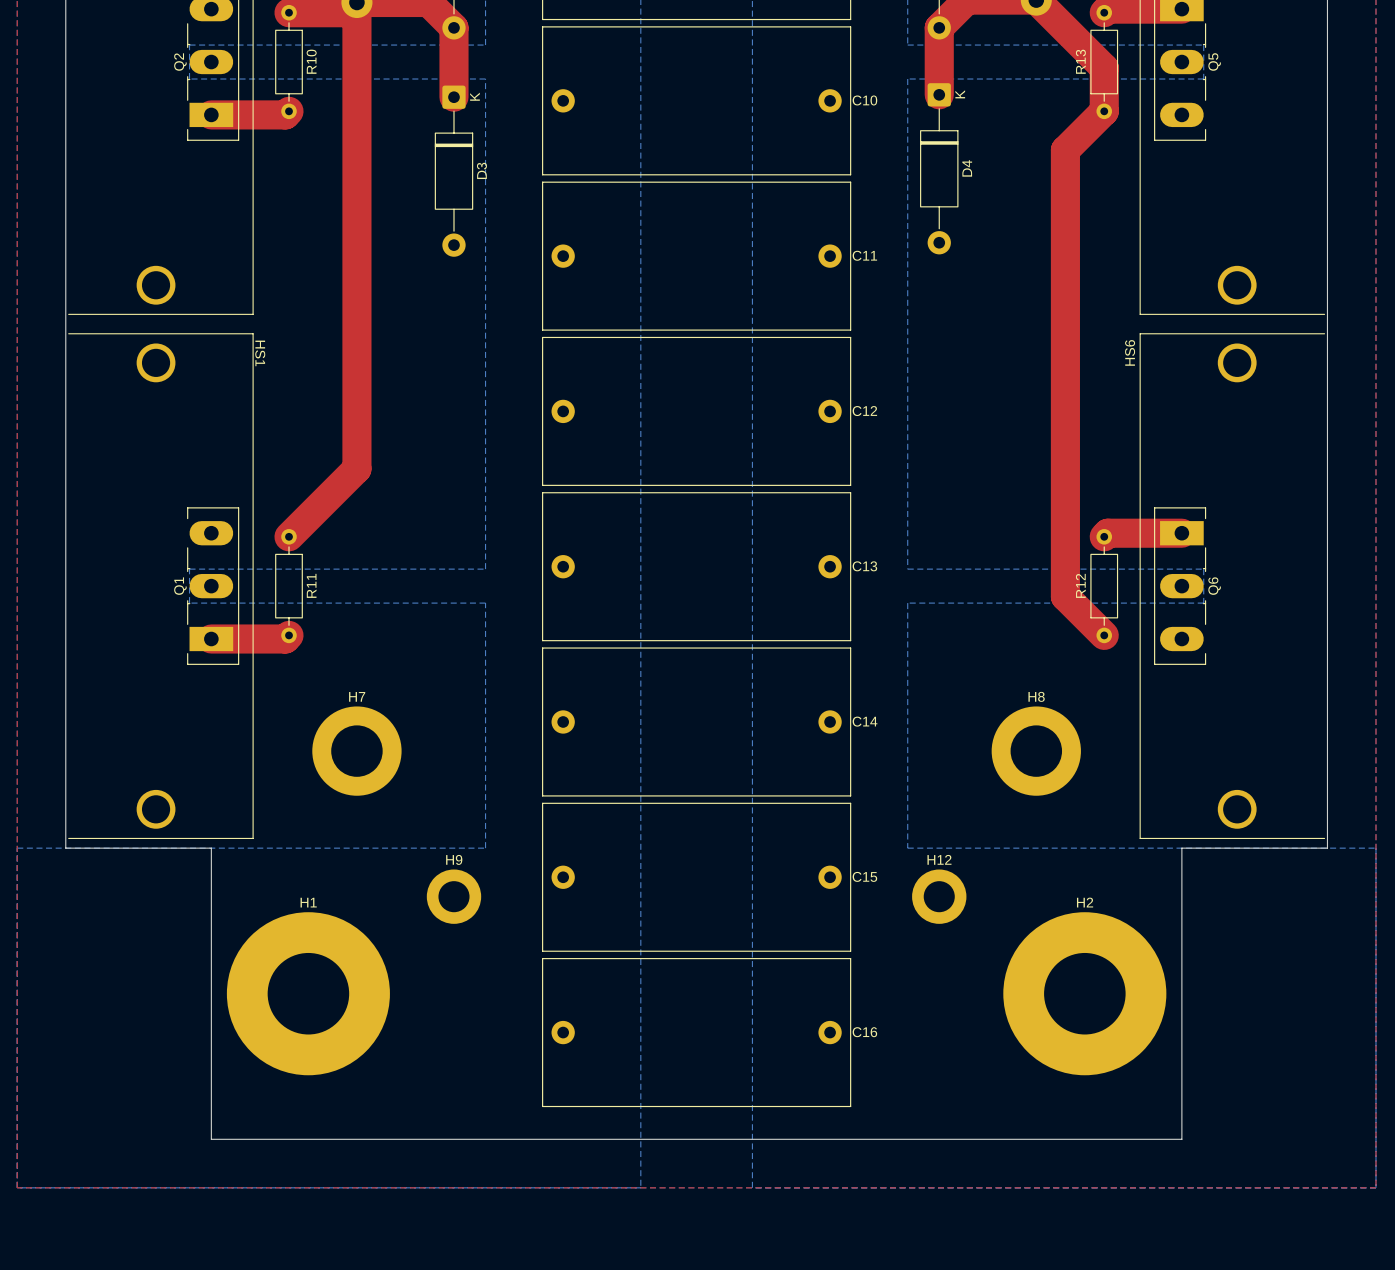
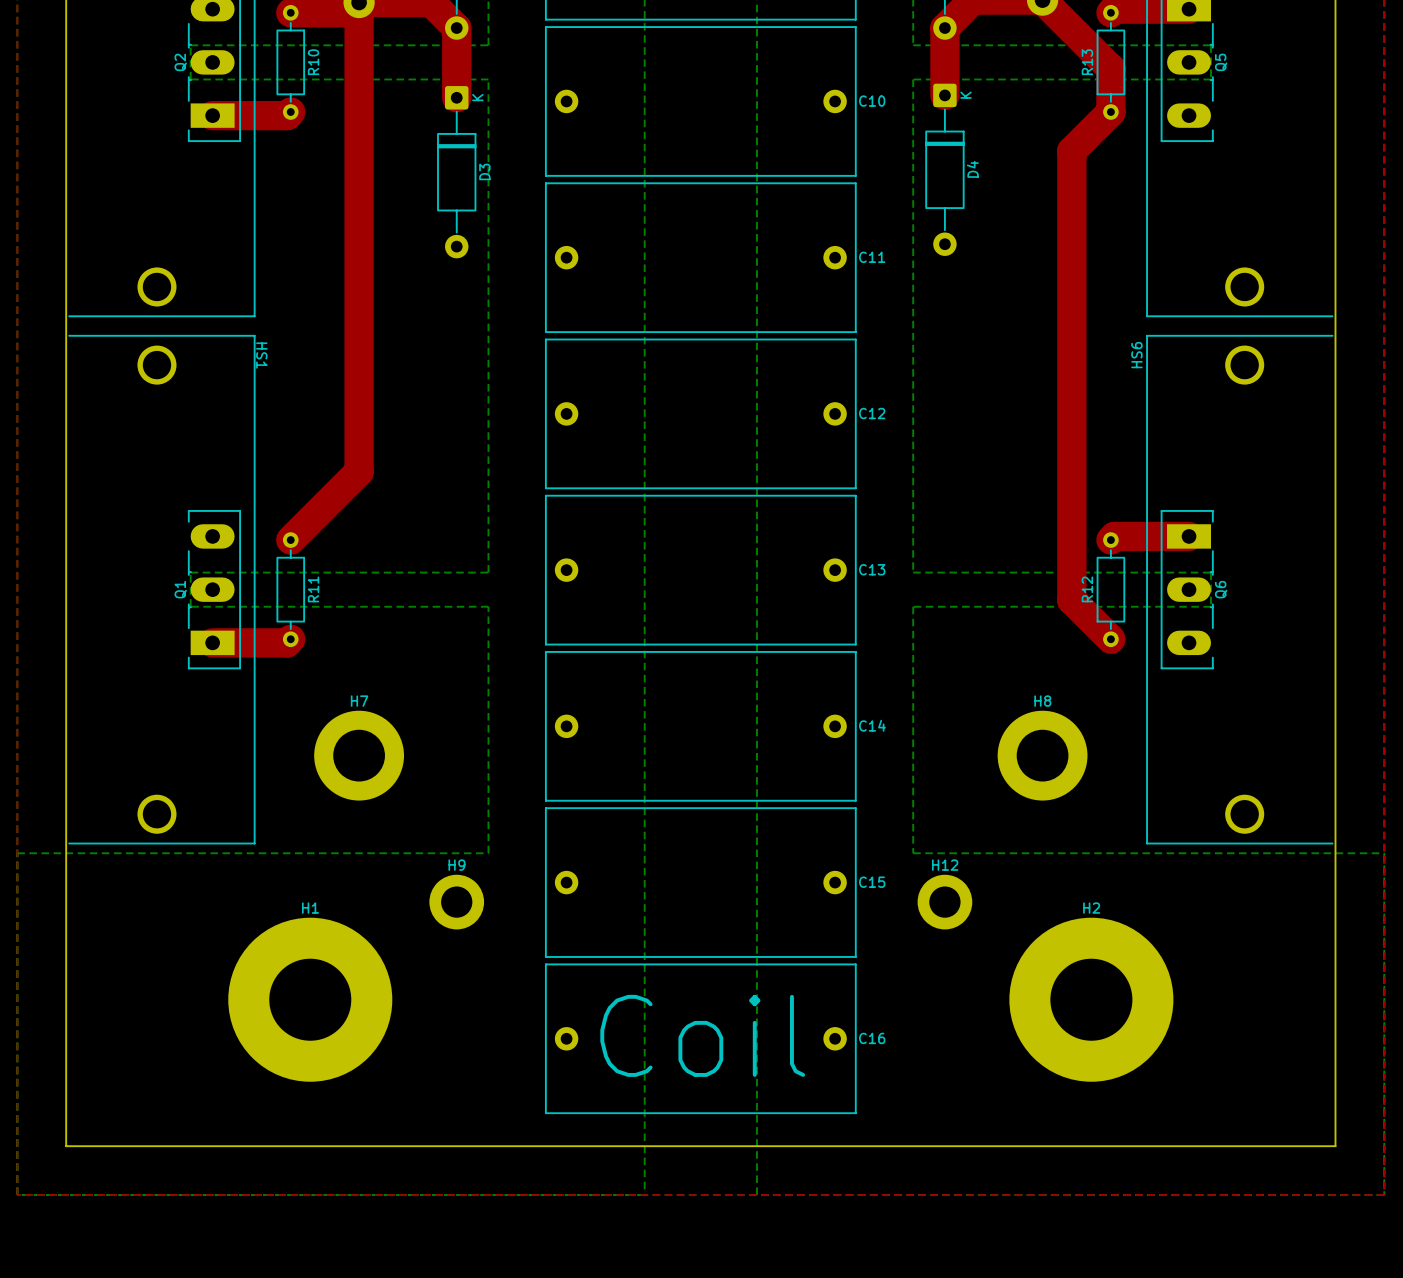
board edge: (65, 848) (211, 848) (211, 1139) -> (66, 853) (66, 1146) (212, 1146)
board edge: (1327, 848) (1181, 848) (1181, 1139) -> (1335, 853) (1335, 1146) (1189, 1146)
text: none -> Coil (702, 1035)

